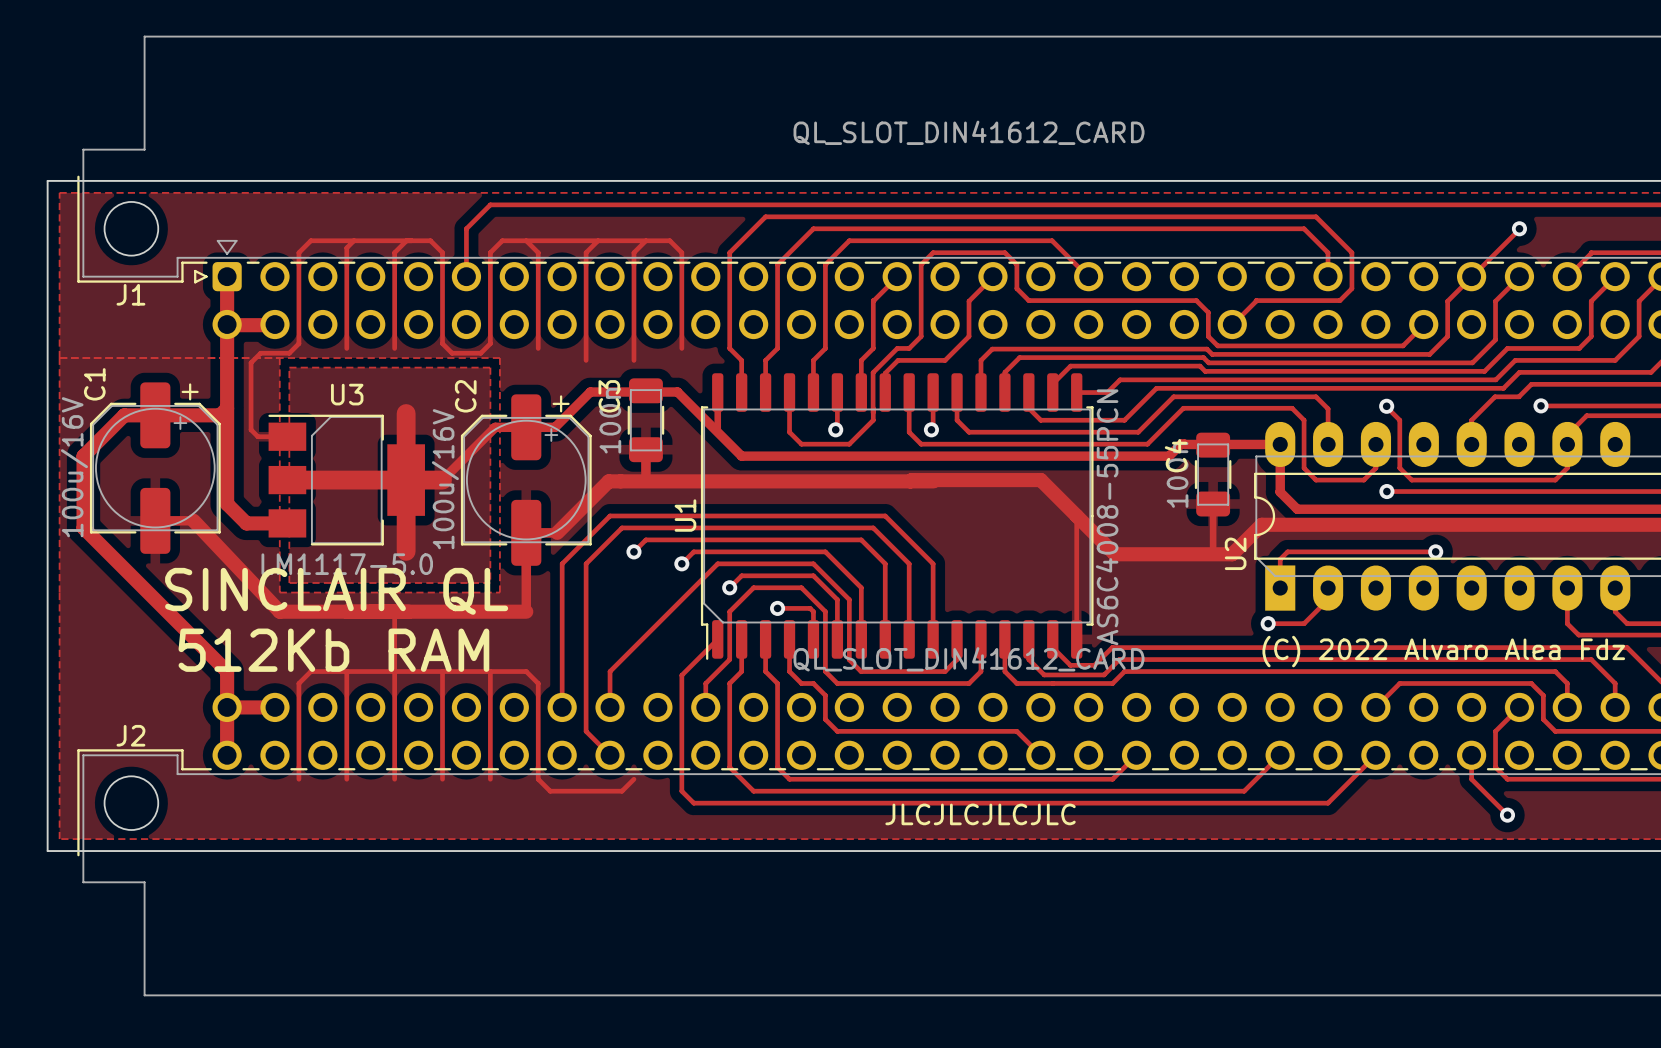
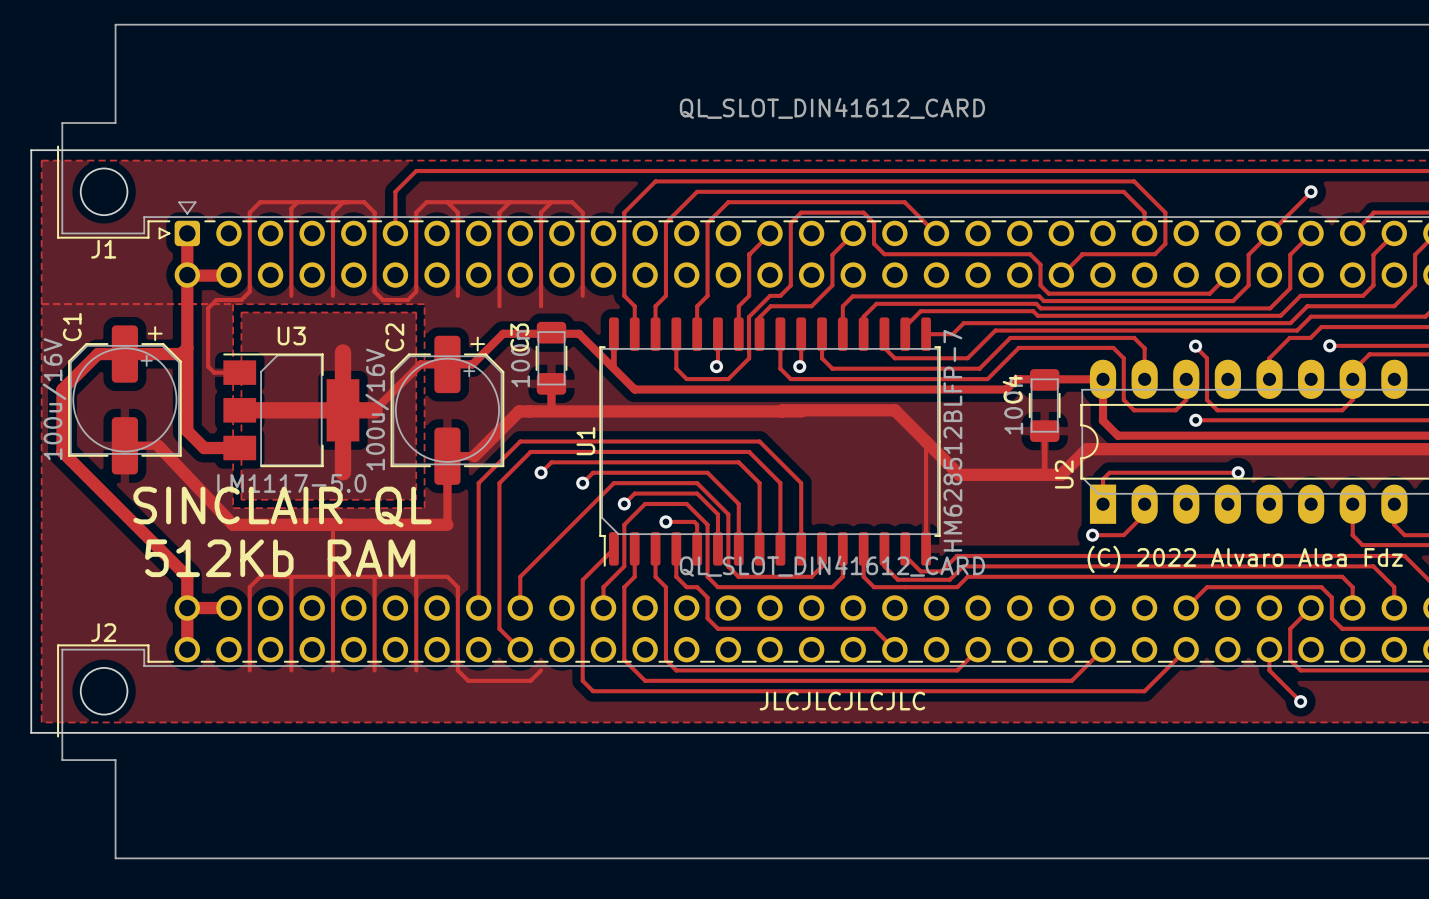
U1 value: AS6C4008-55PCN (1107, 517) -> HM628512BLFP-7 (952, 440)

